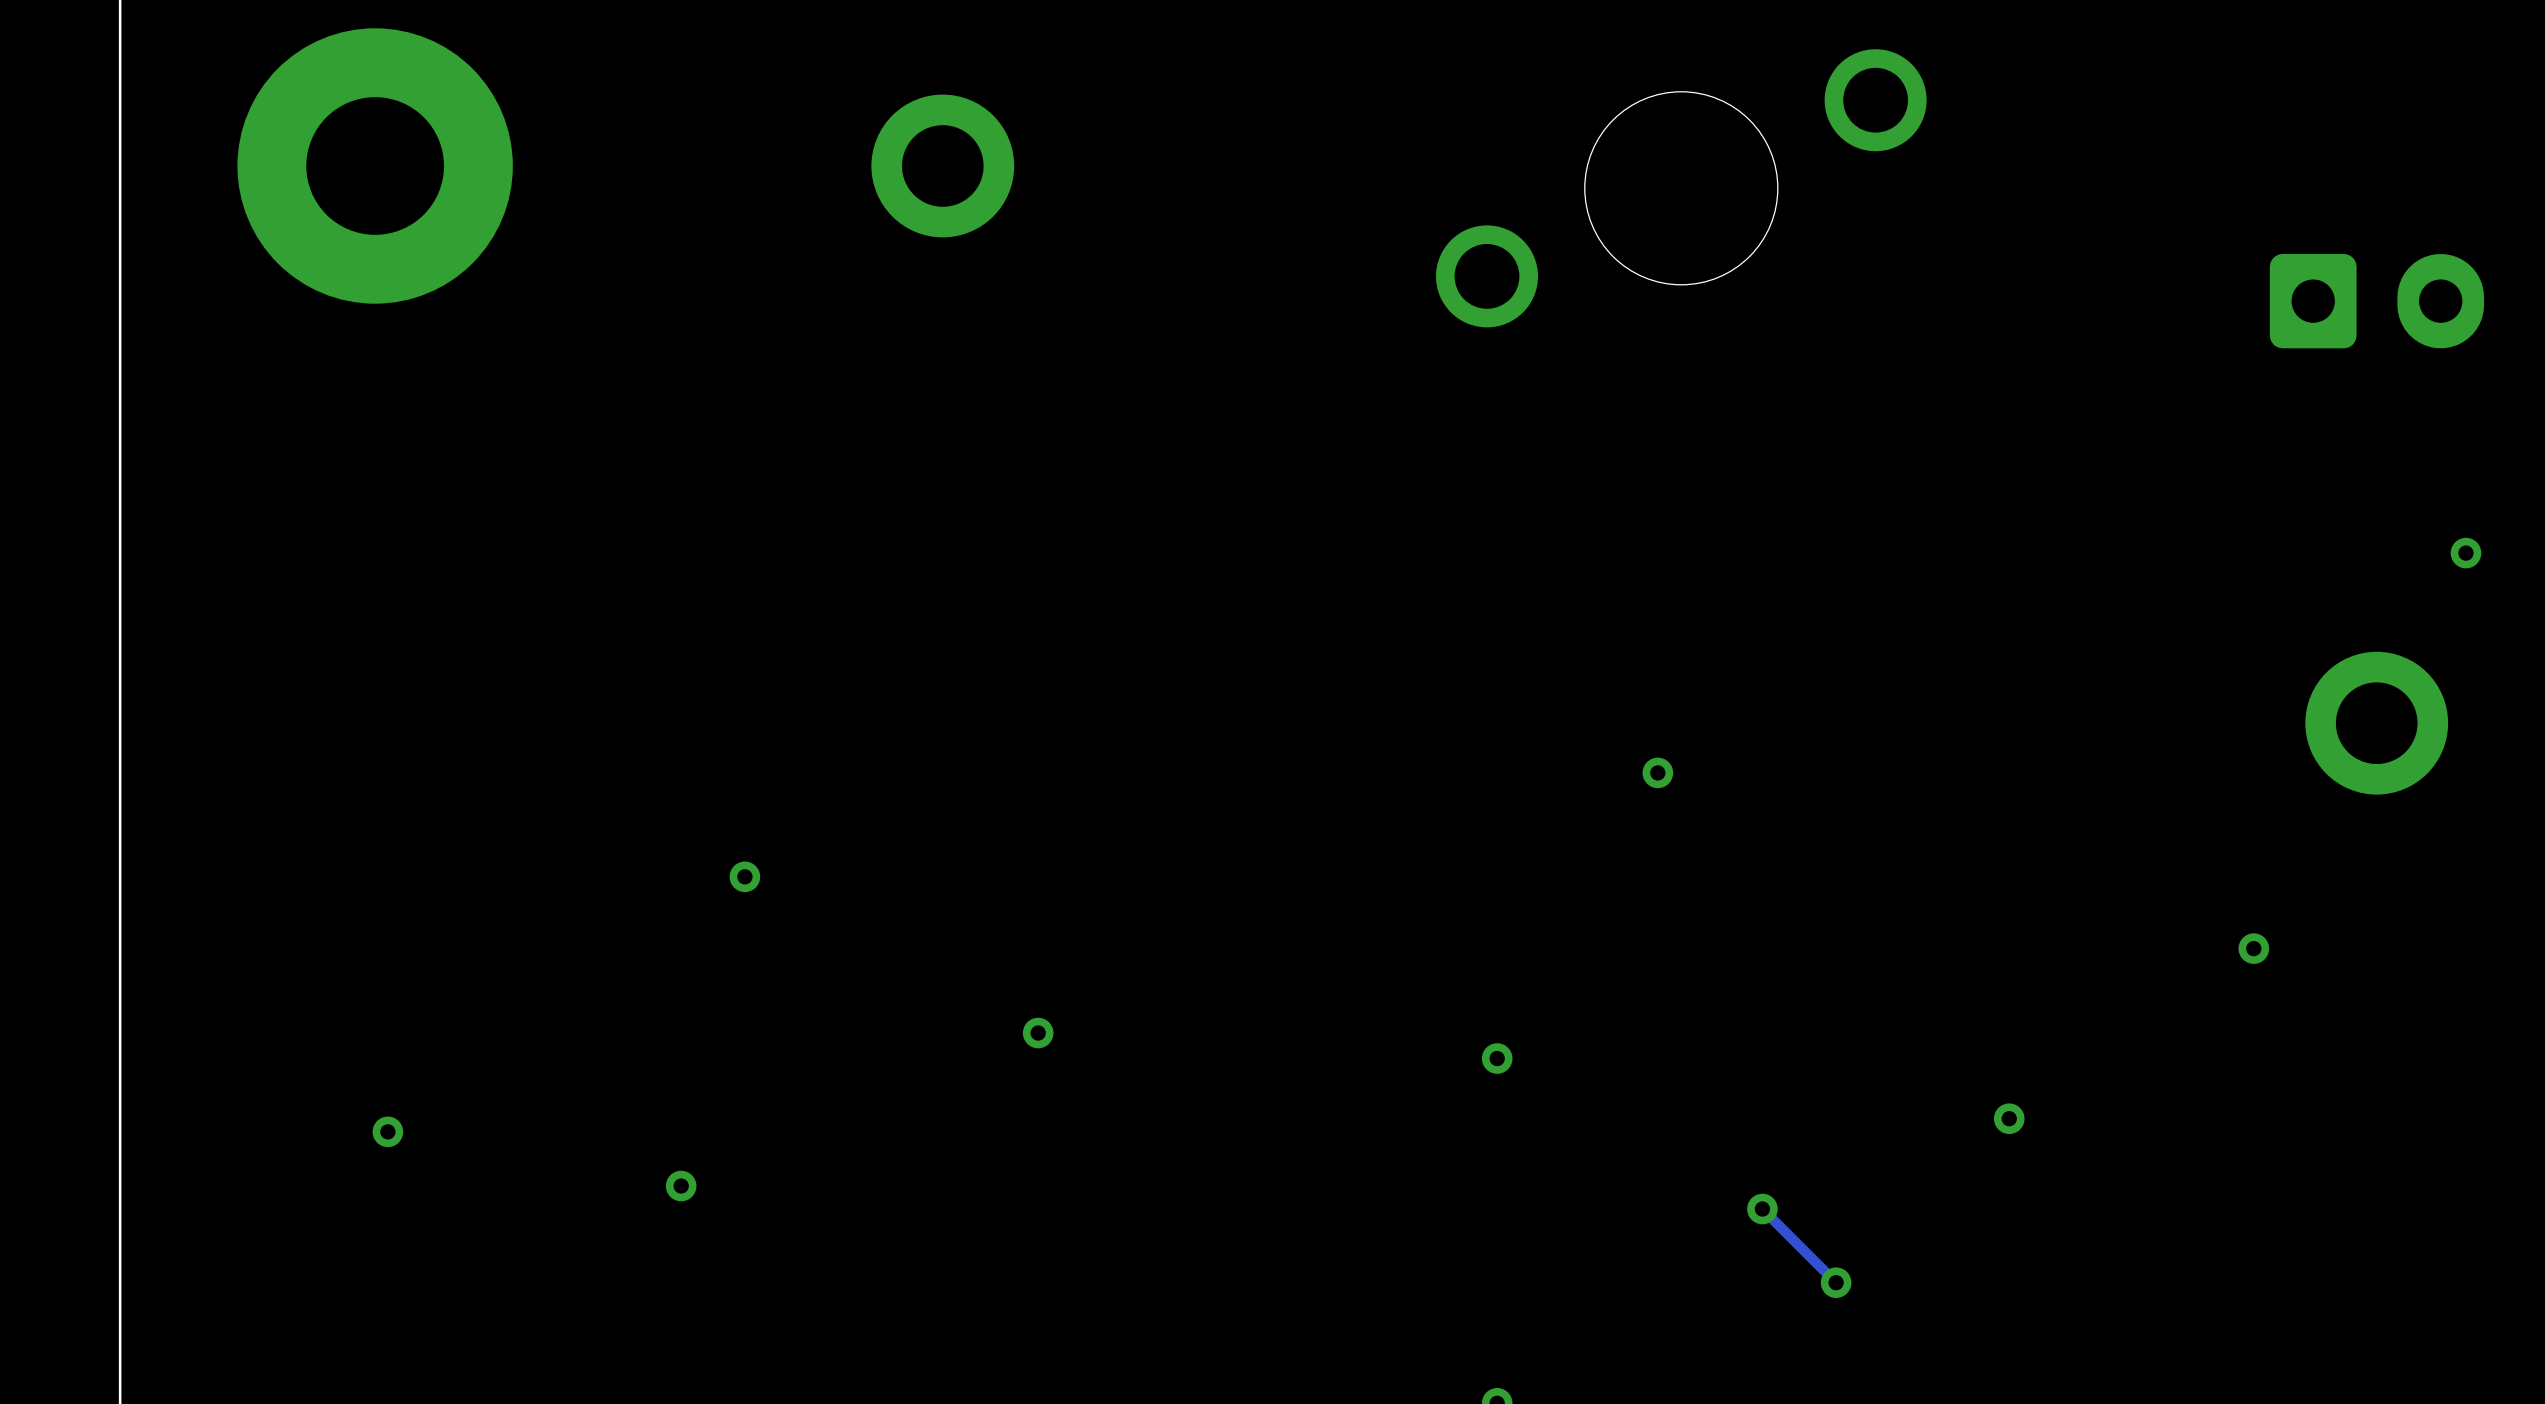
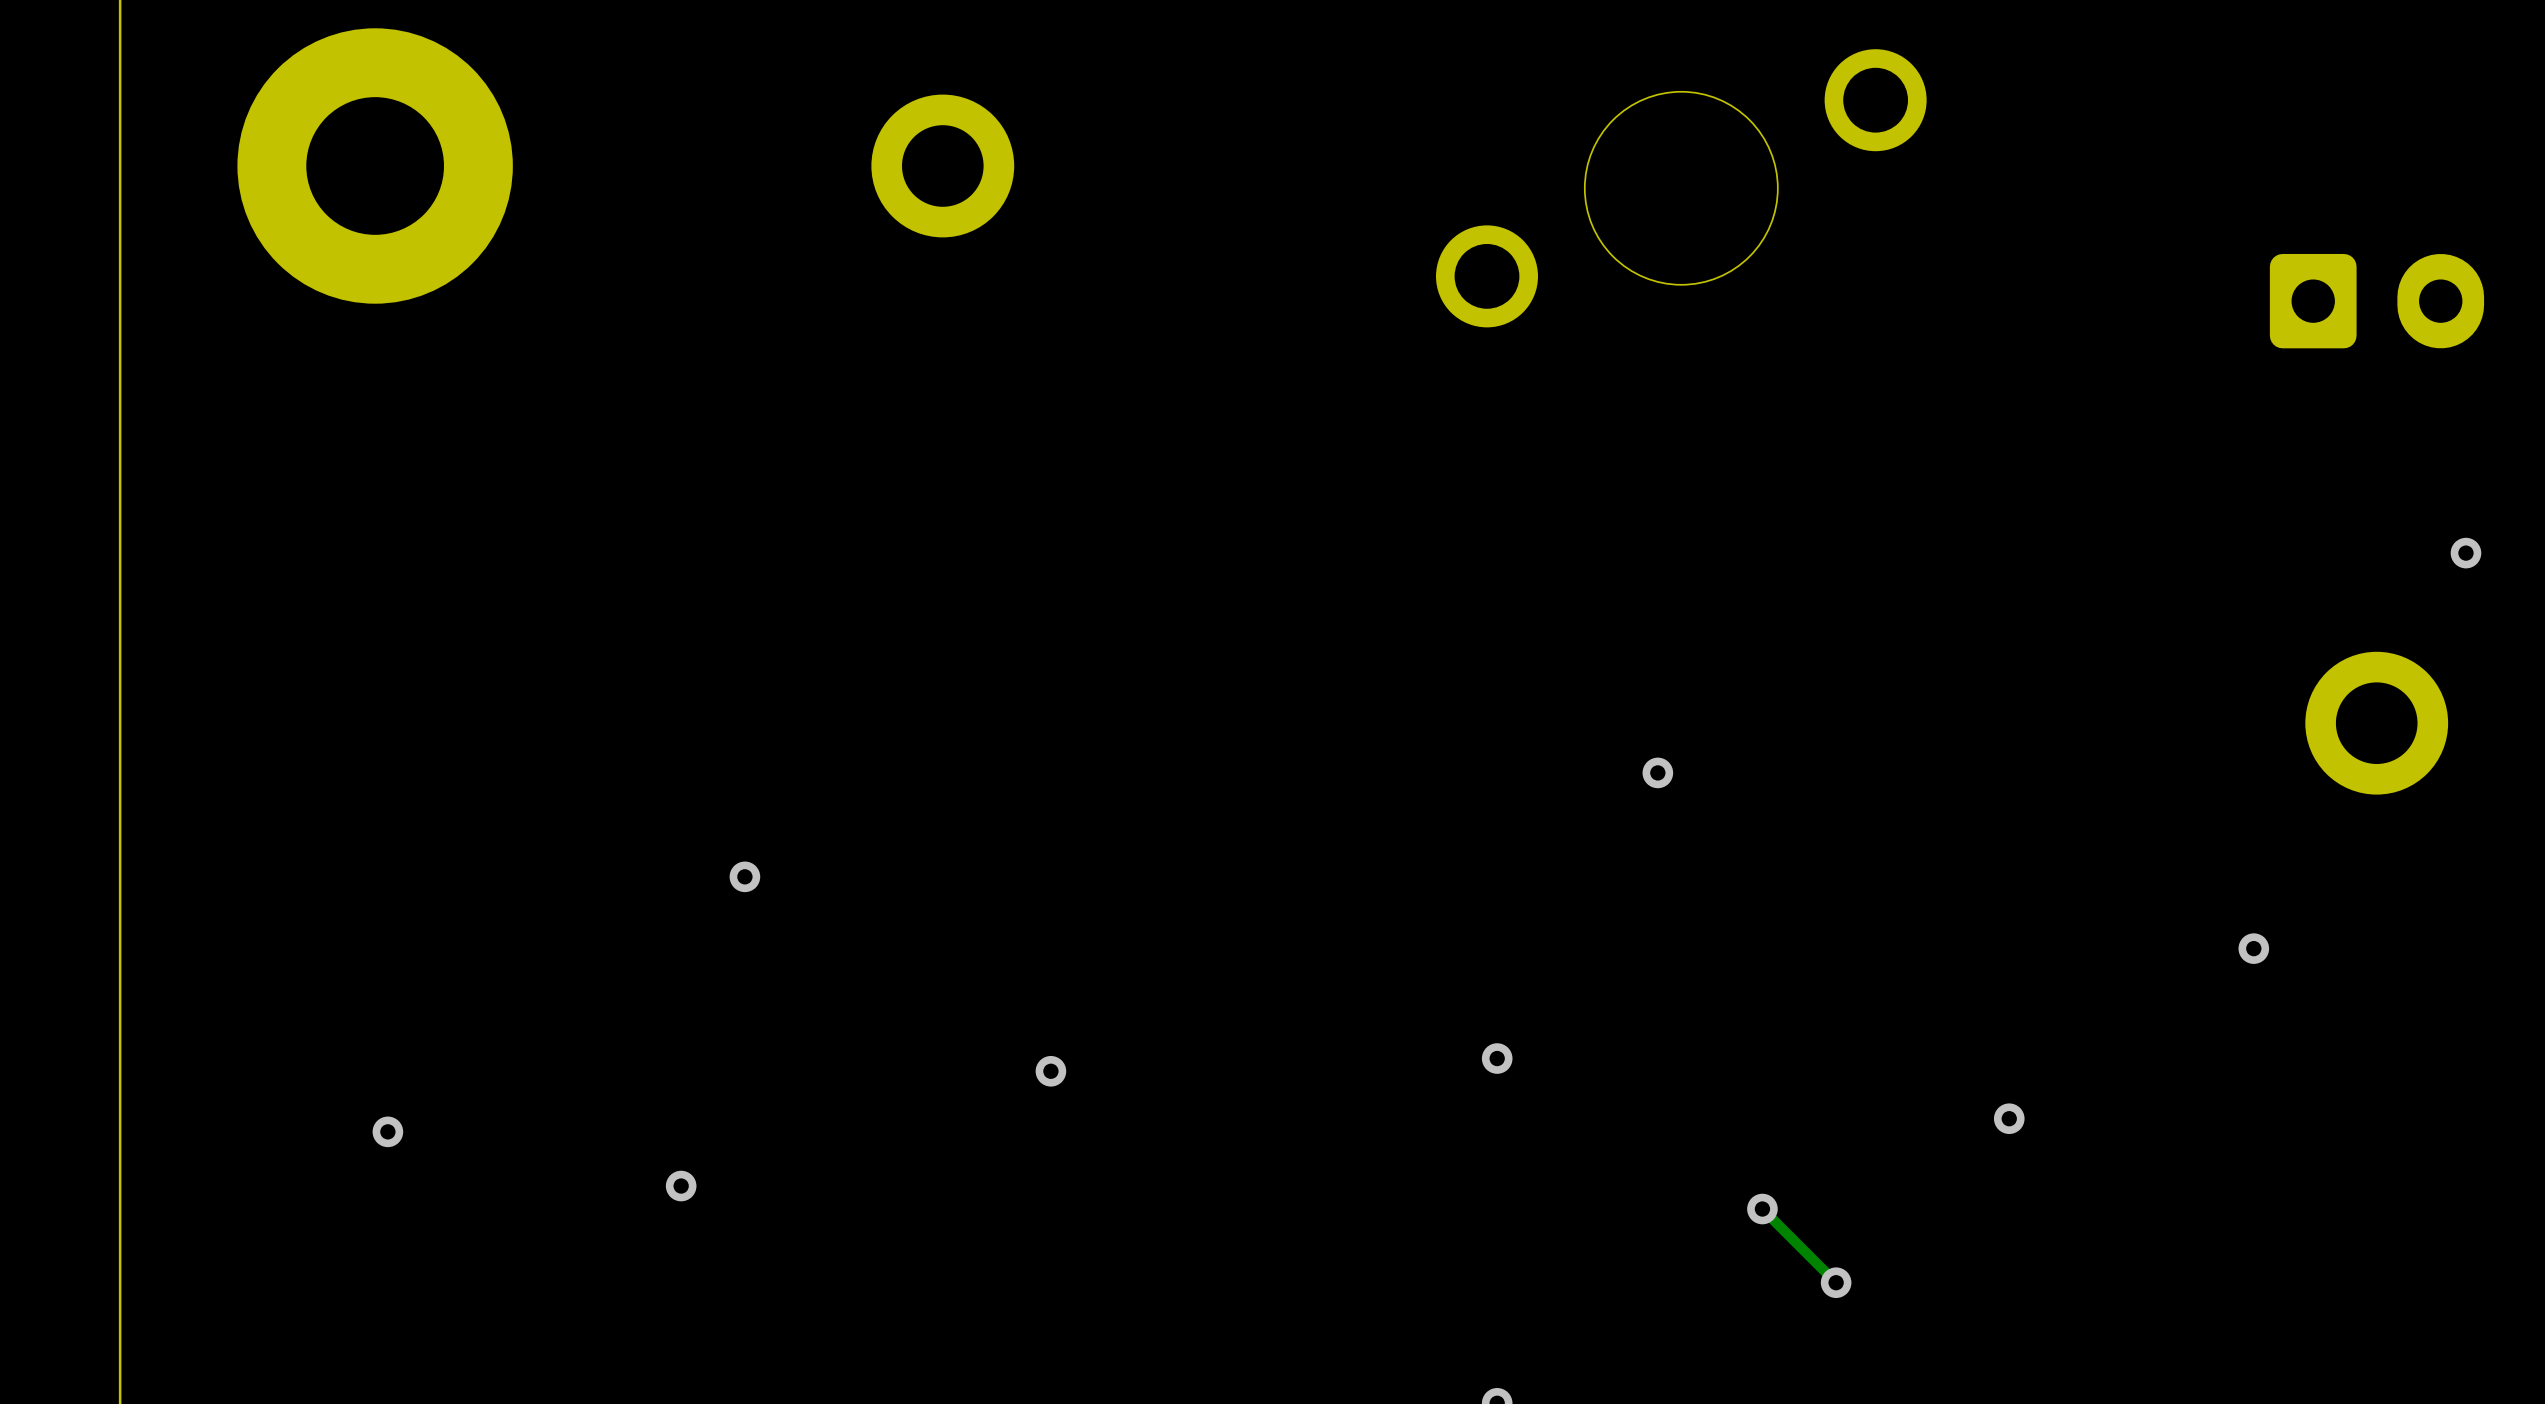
via position: (1038, 1033) -> (1050, 1071)

